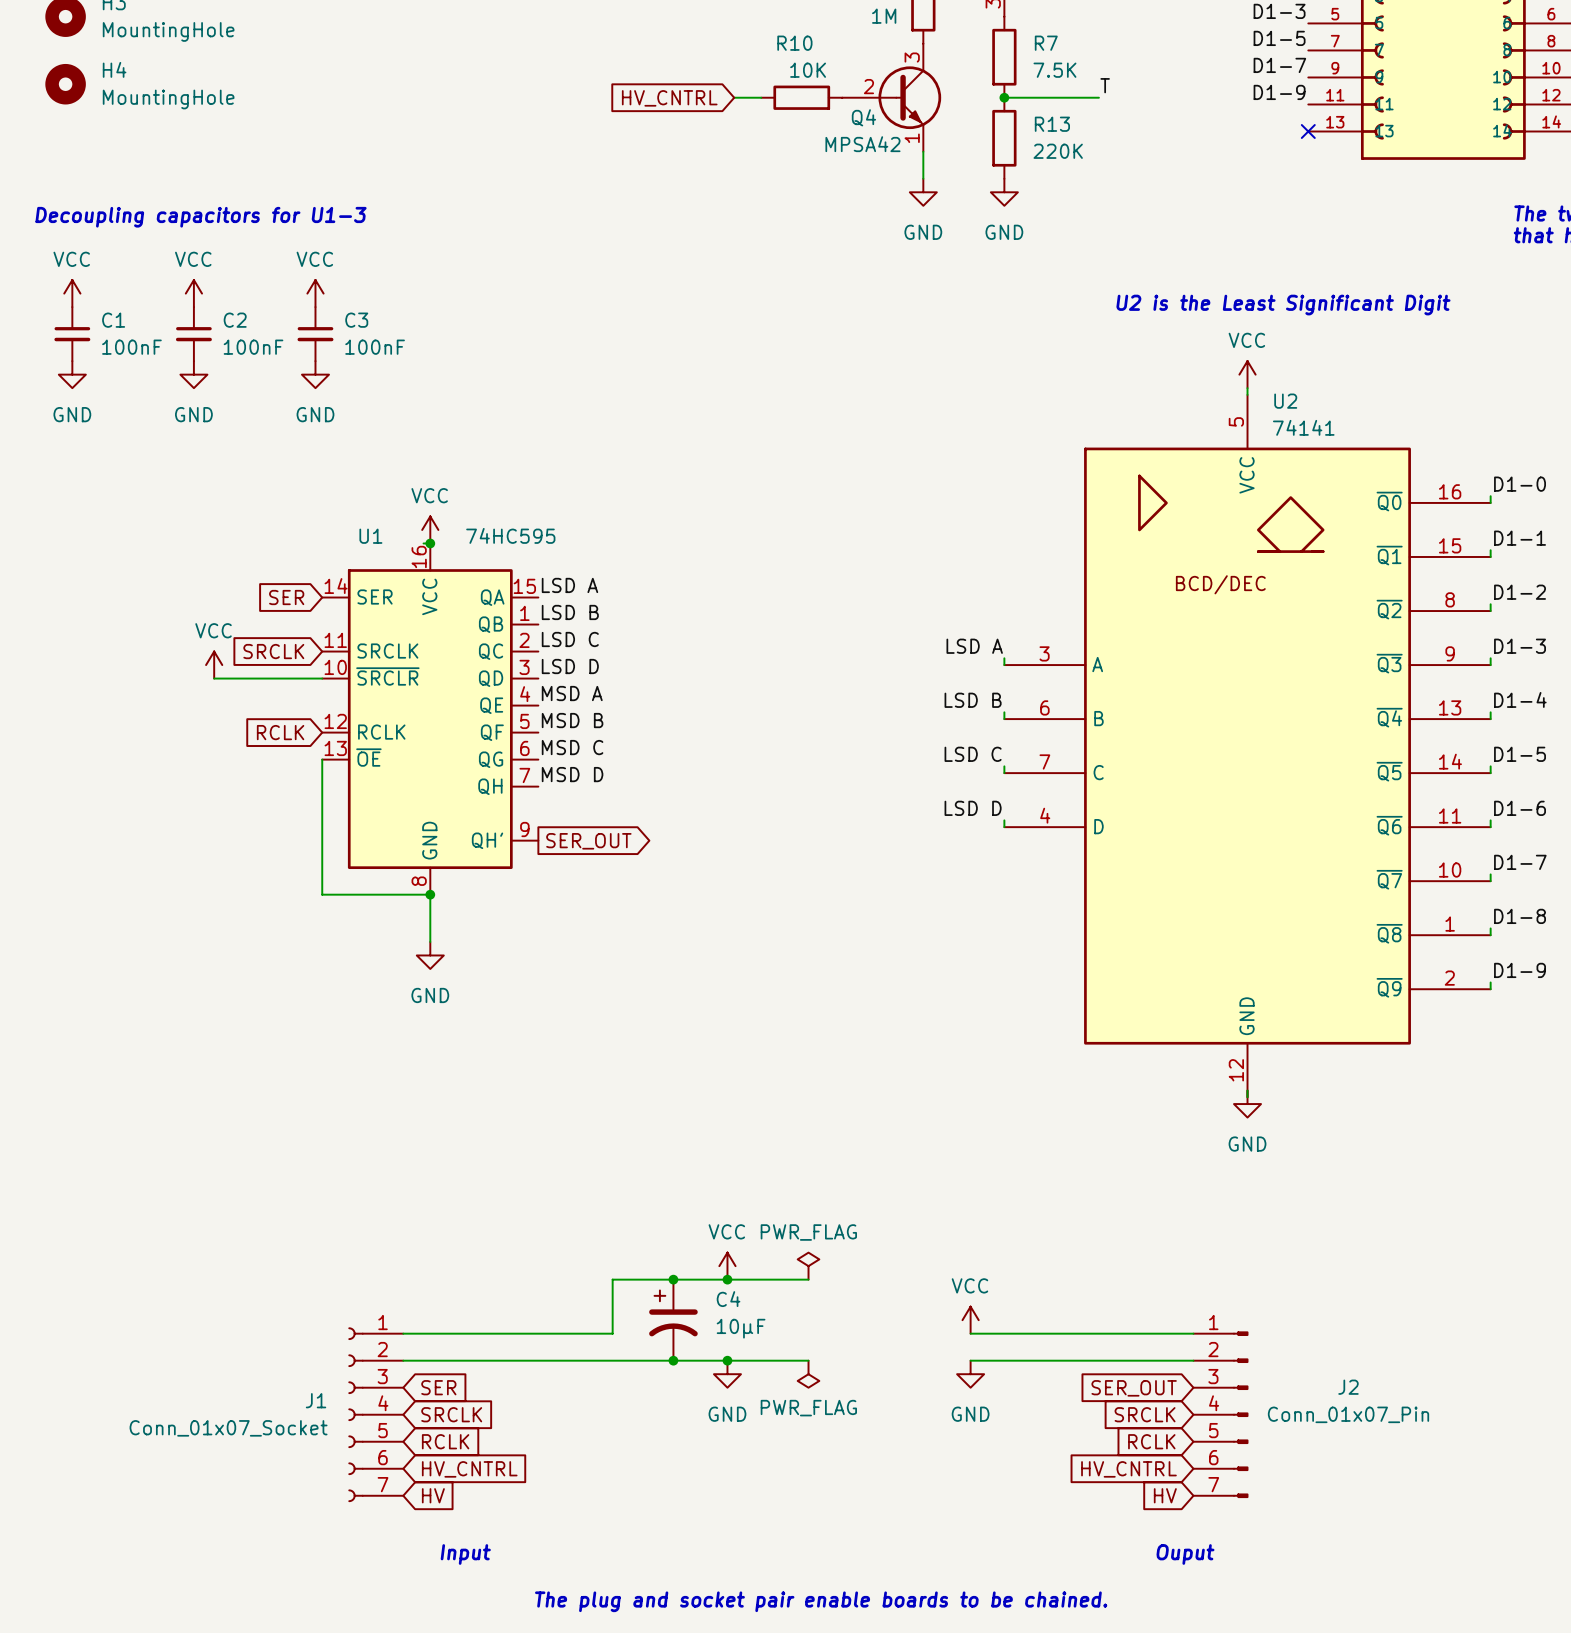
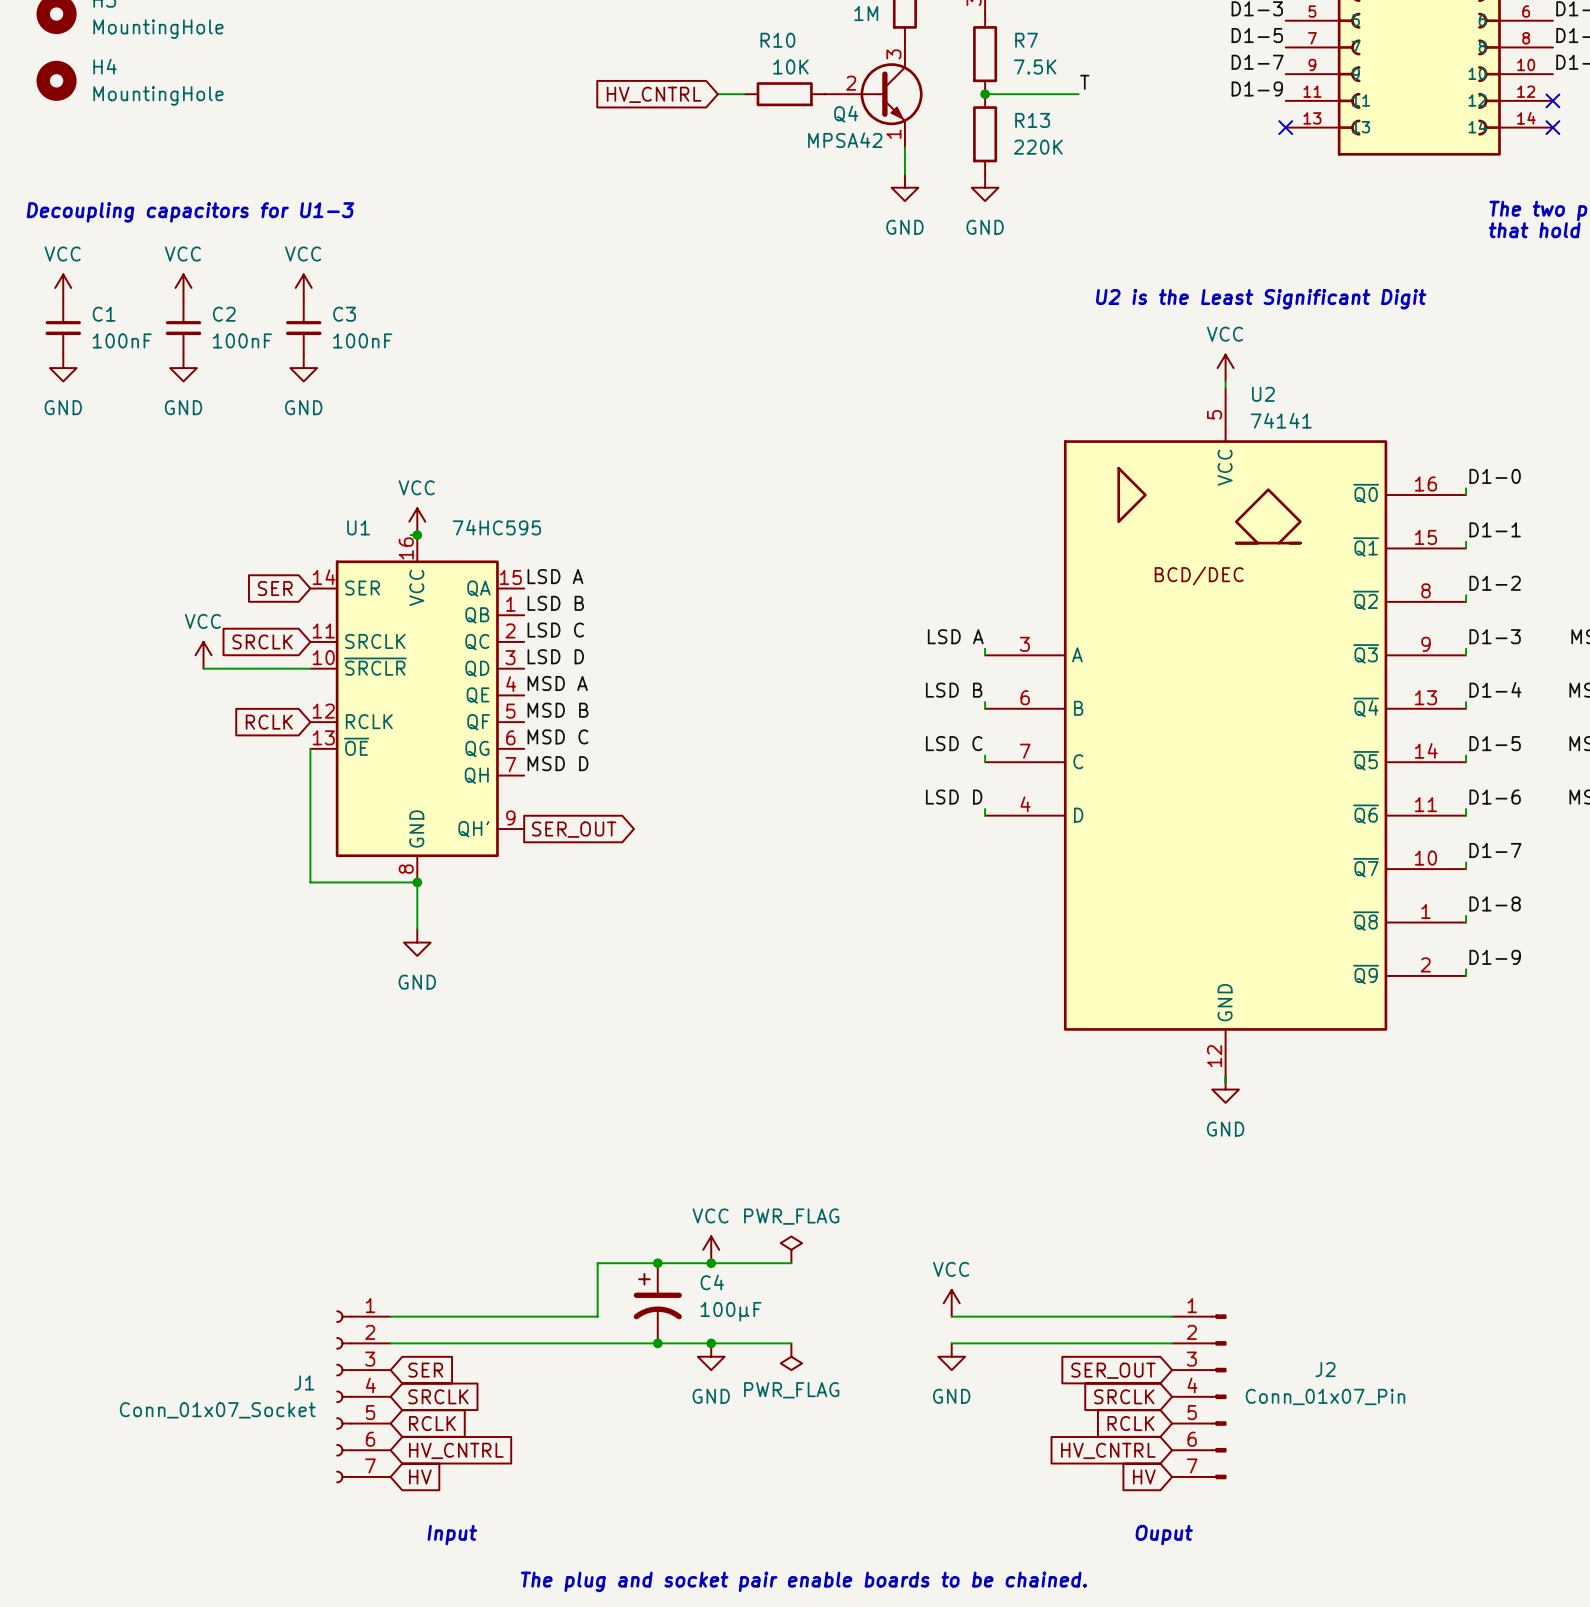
C4 value: 10µF (741, 1328) -> 100µF (731, 1311)

